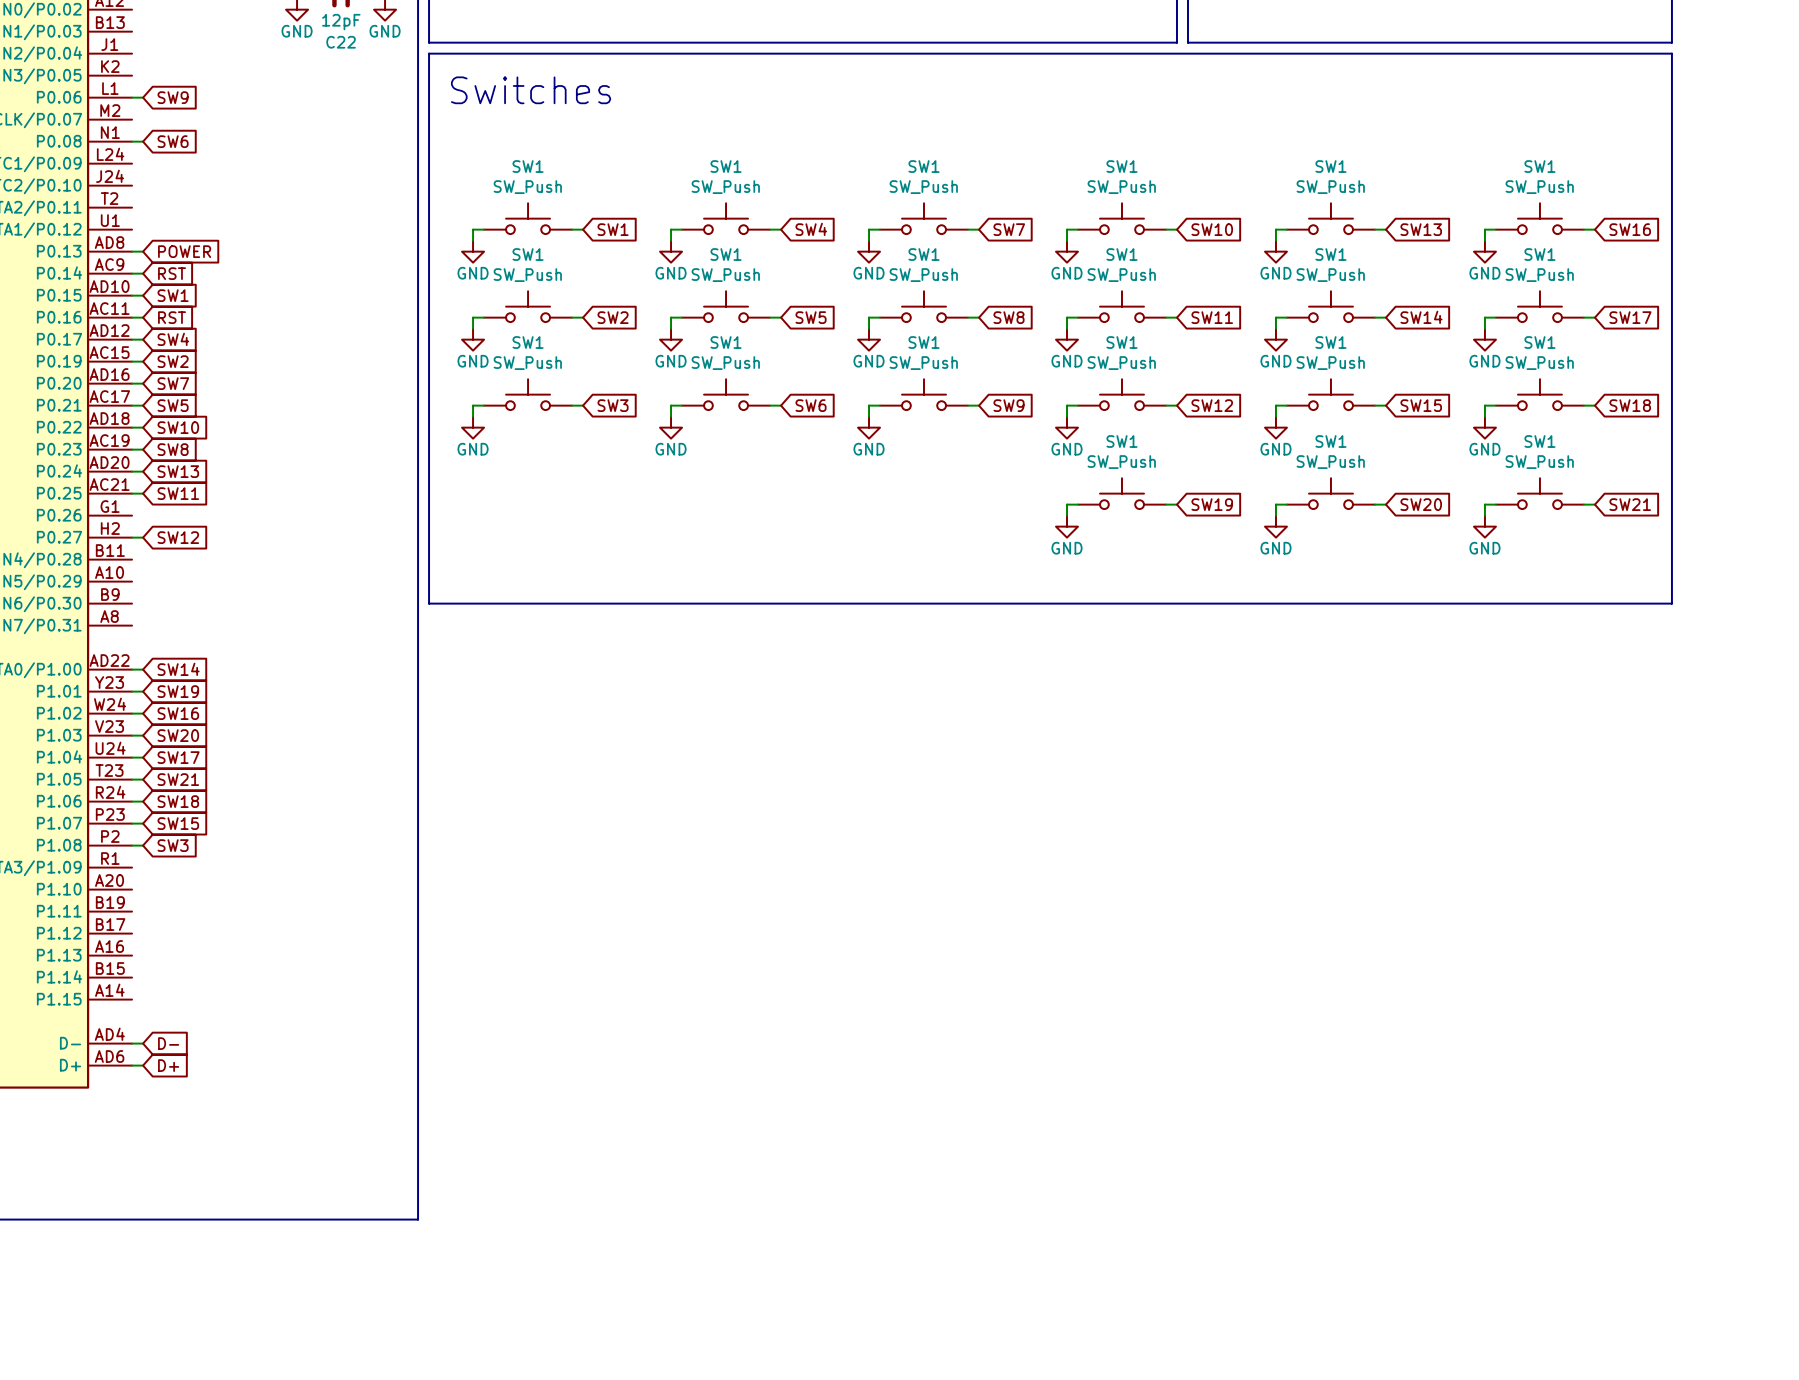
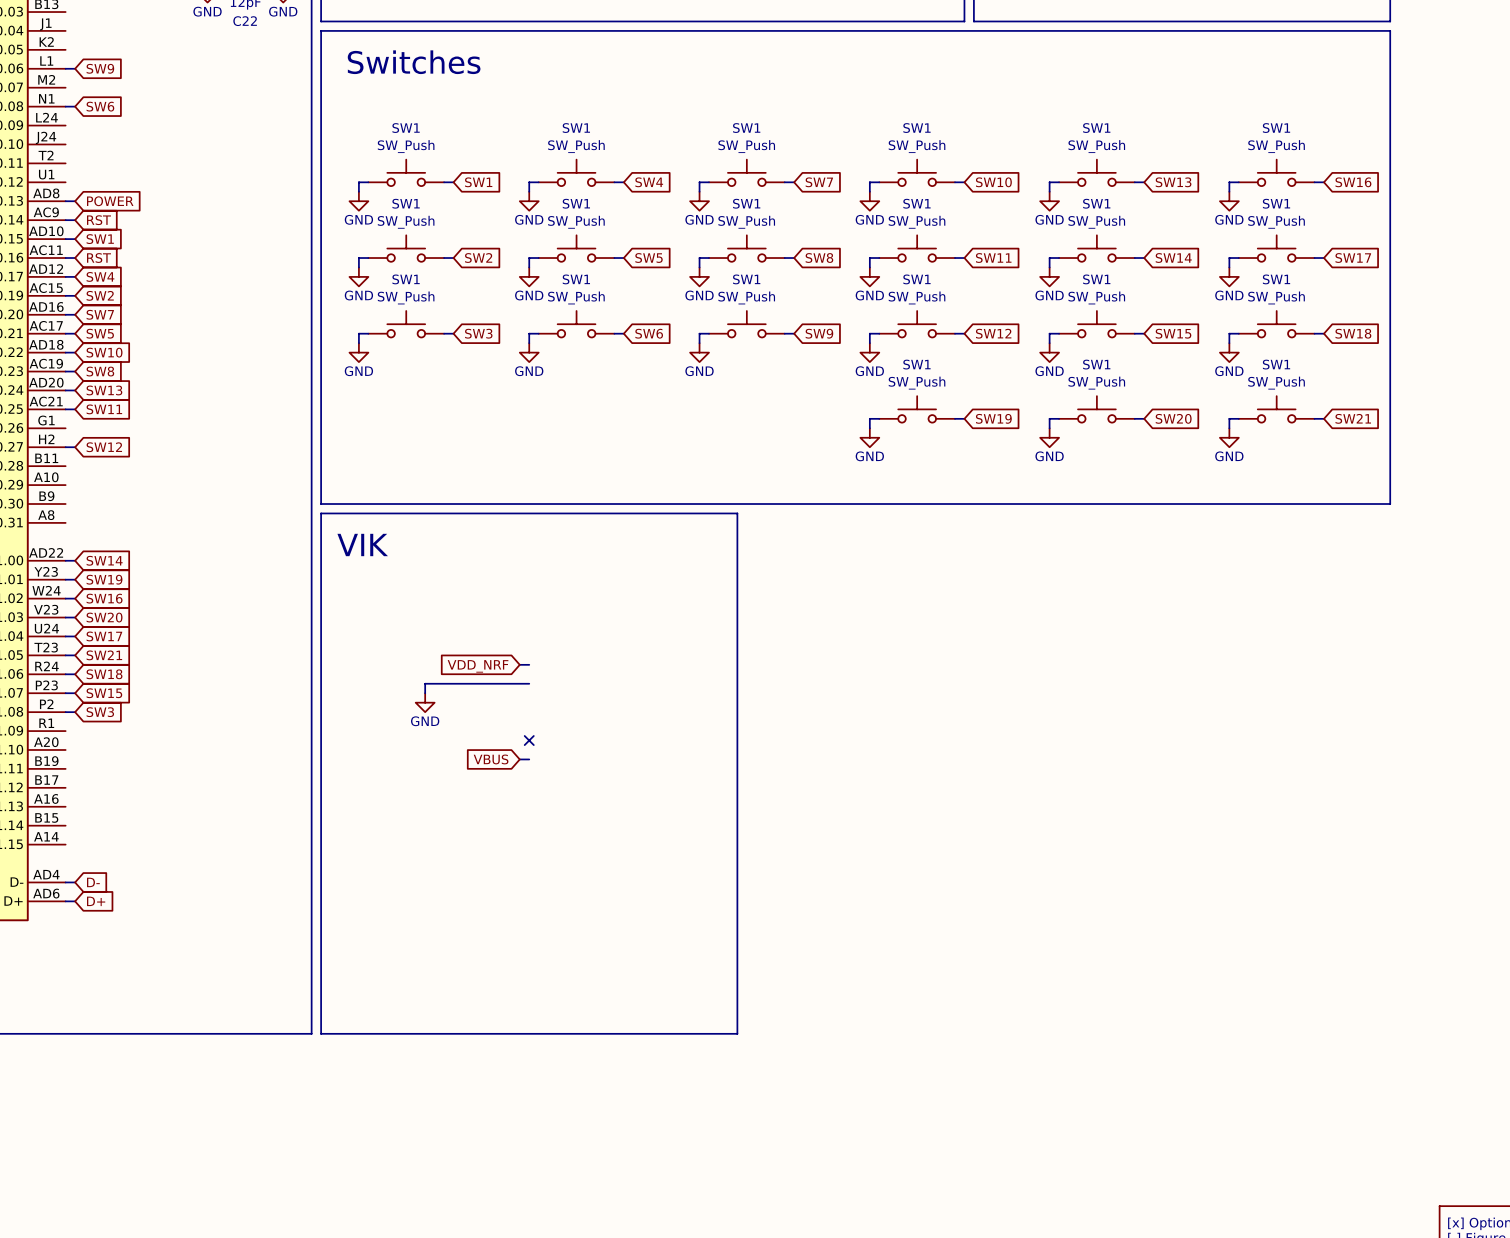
line: none -> (321, 513) (737, 513) (737, 1033) (321, 1033) (321, 513)
text: none -> VIK (362, 544)
wire: none -> (519, 664) (529, 664)
global label: none -> VDD_NRF (478, 666)
wire: none -> (529, 683) (425, 683) (425, 693)
power symbol: none -> GND (425, 702)
no-connect mark: none -> (529, 740)
global label: none -> VBUS (491, 759)
wire: none -> (519, 759) (529, 759)

